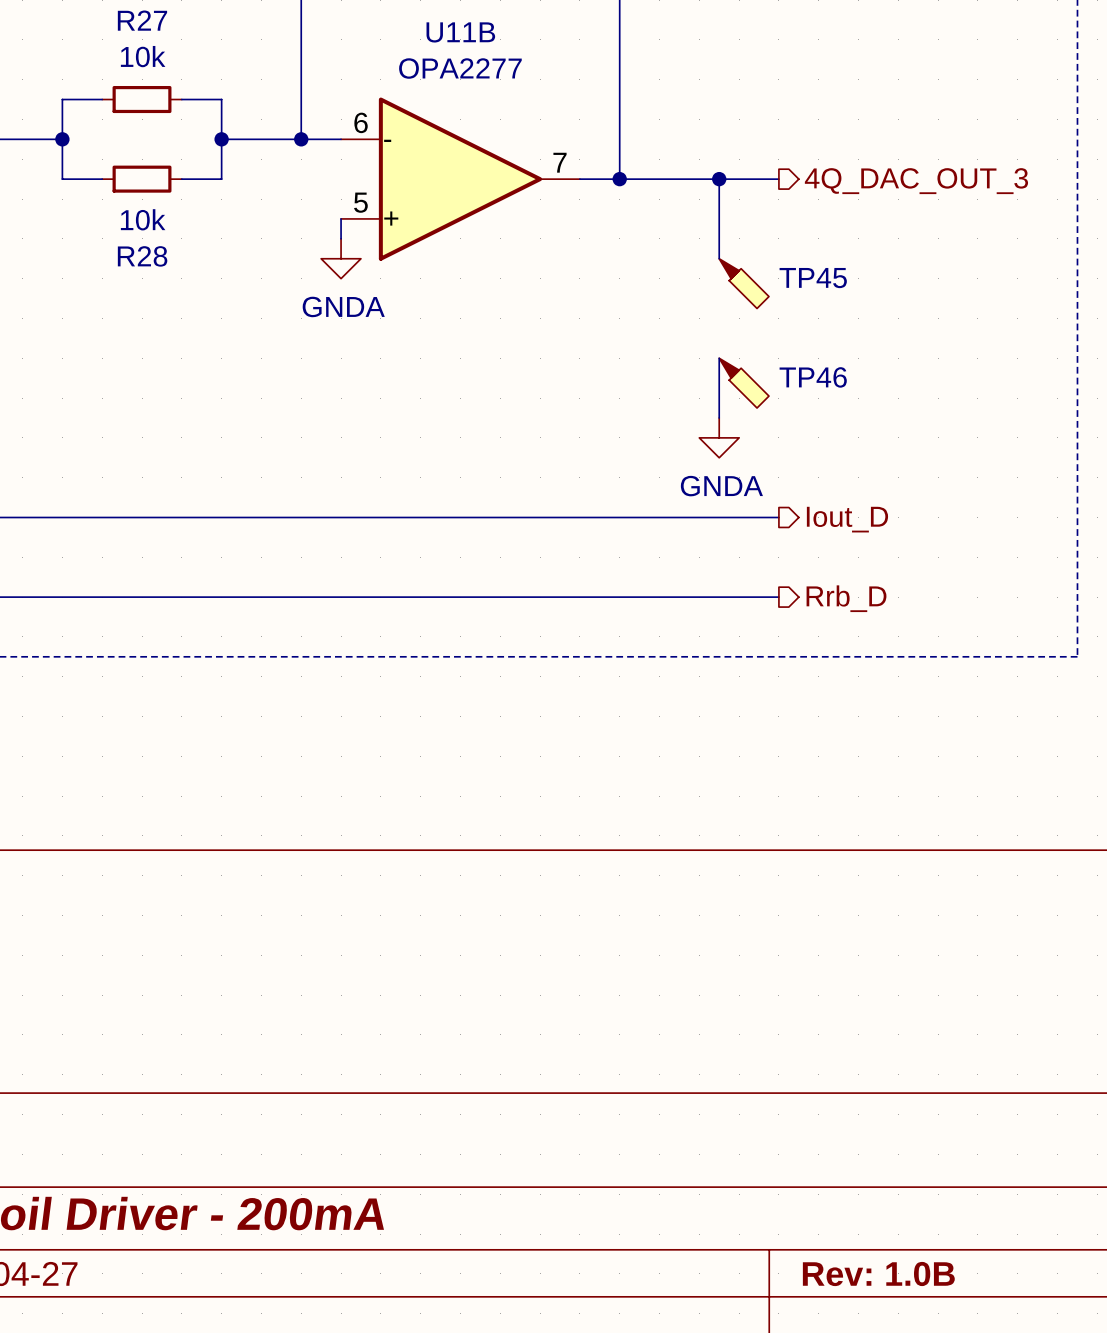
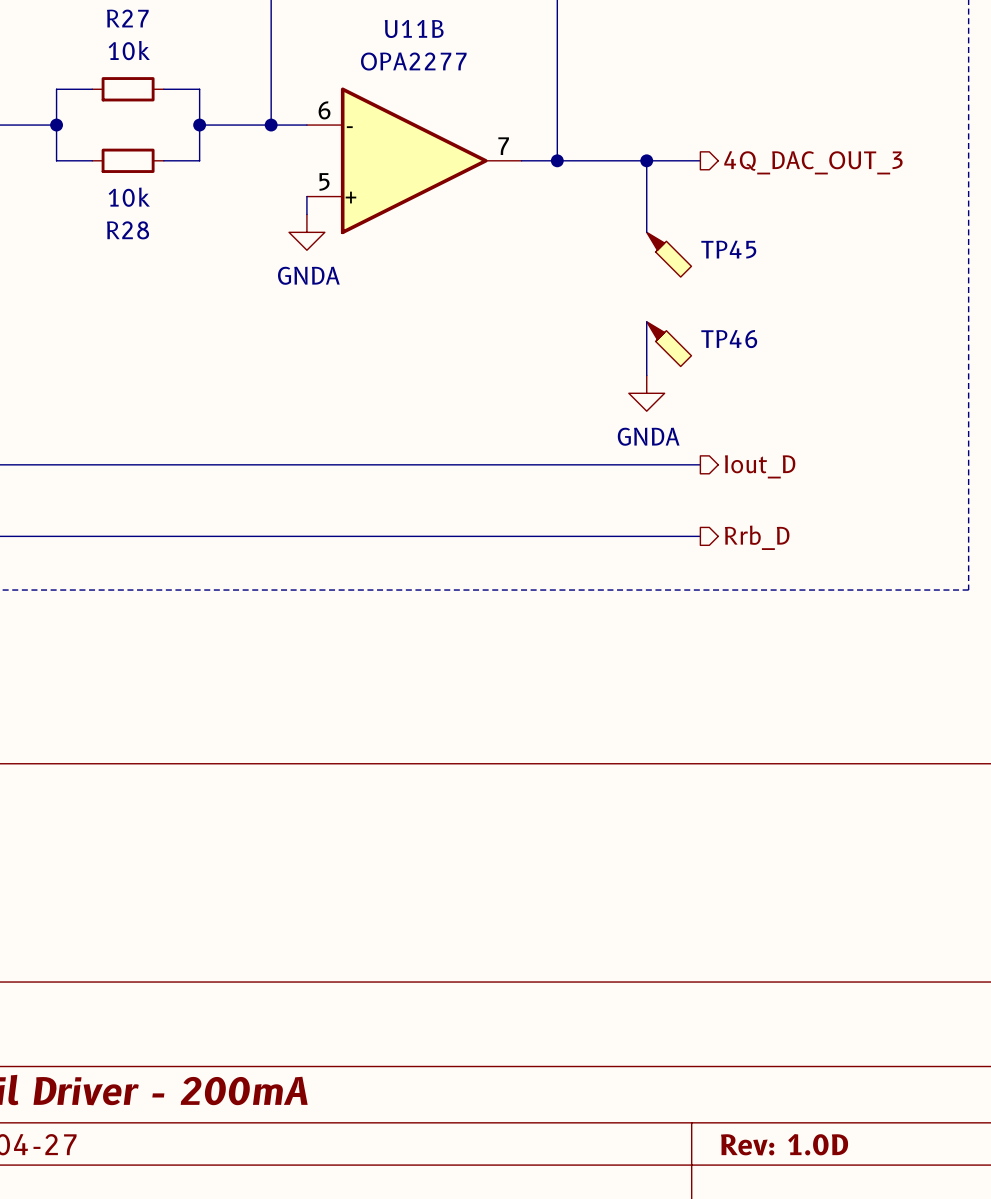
title block: Rev: 1.0B (878, 1274) -> Rev: 1.0D (784, 1144)

